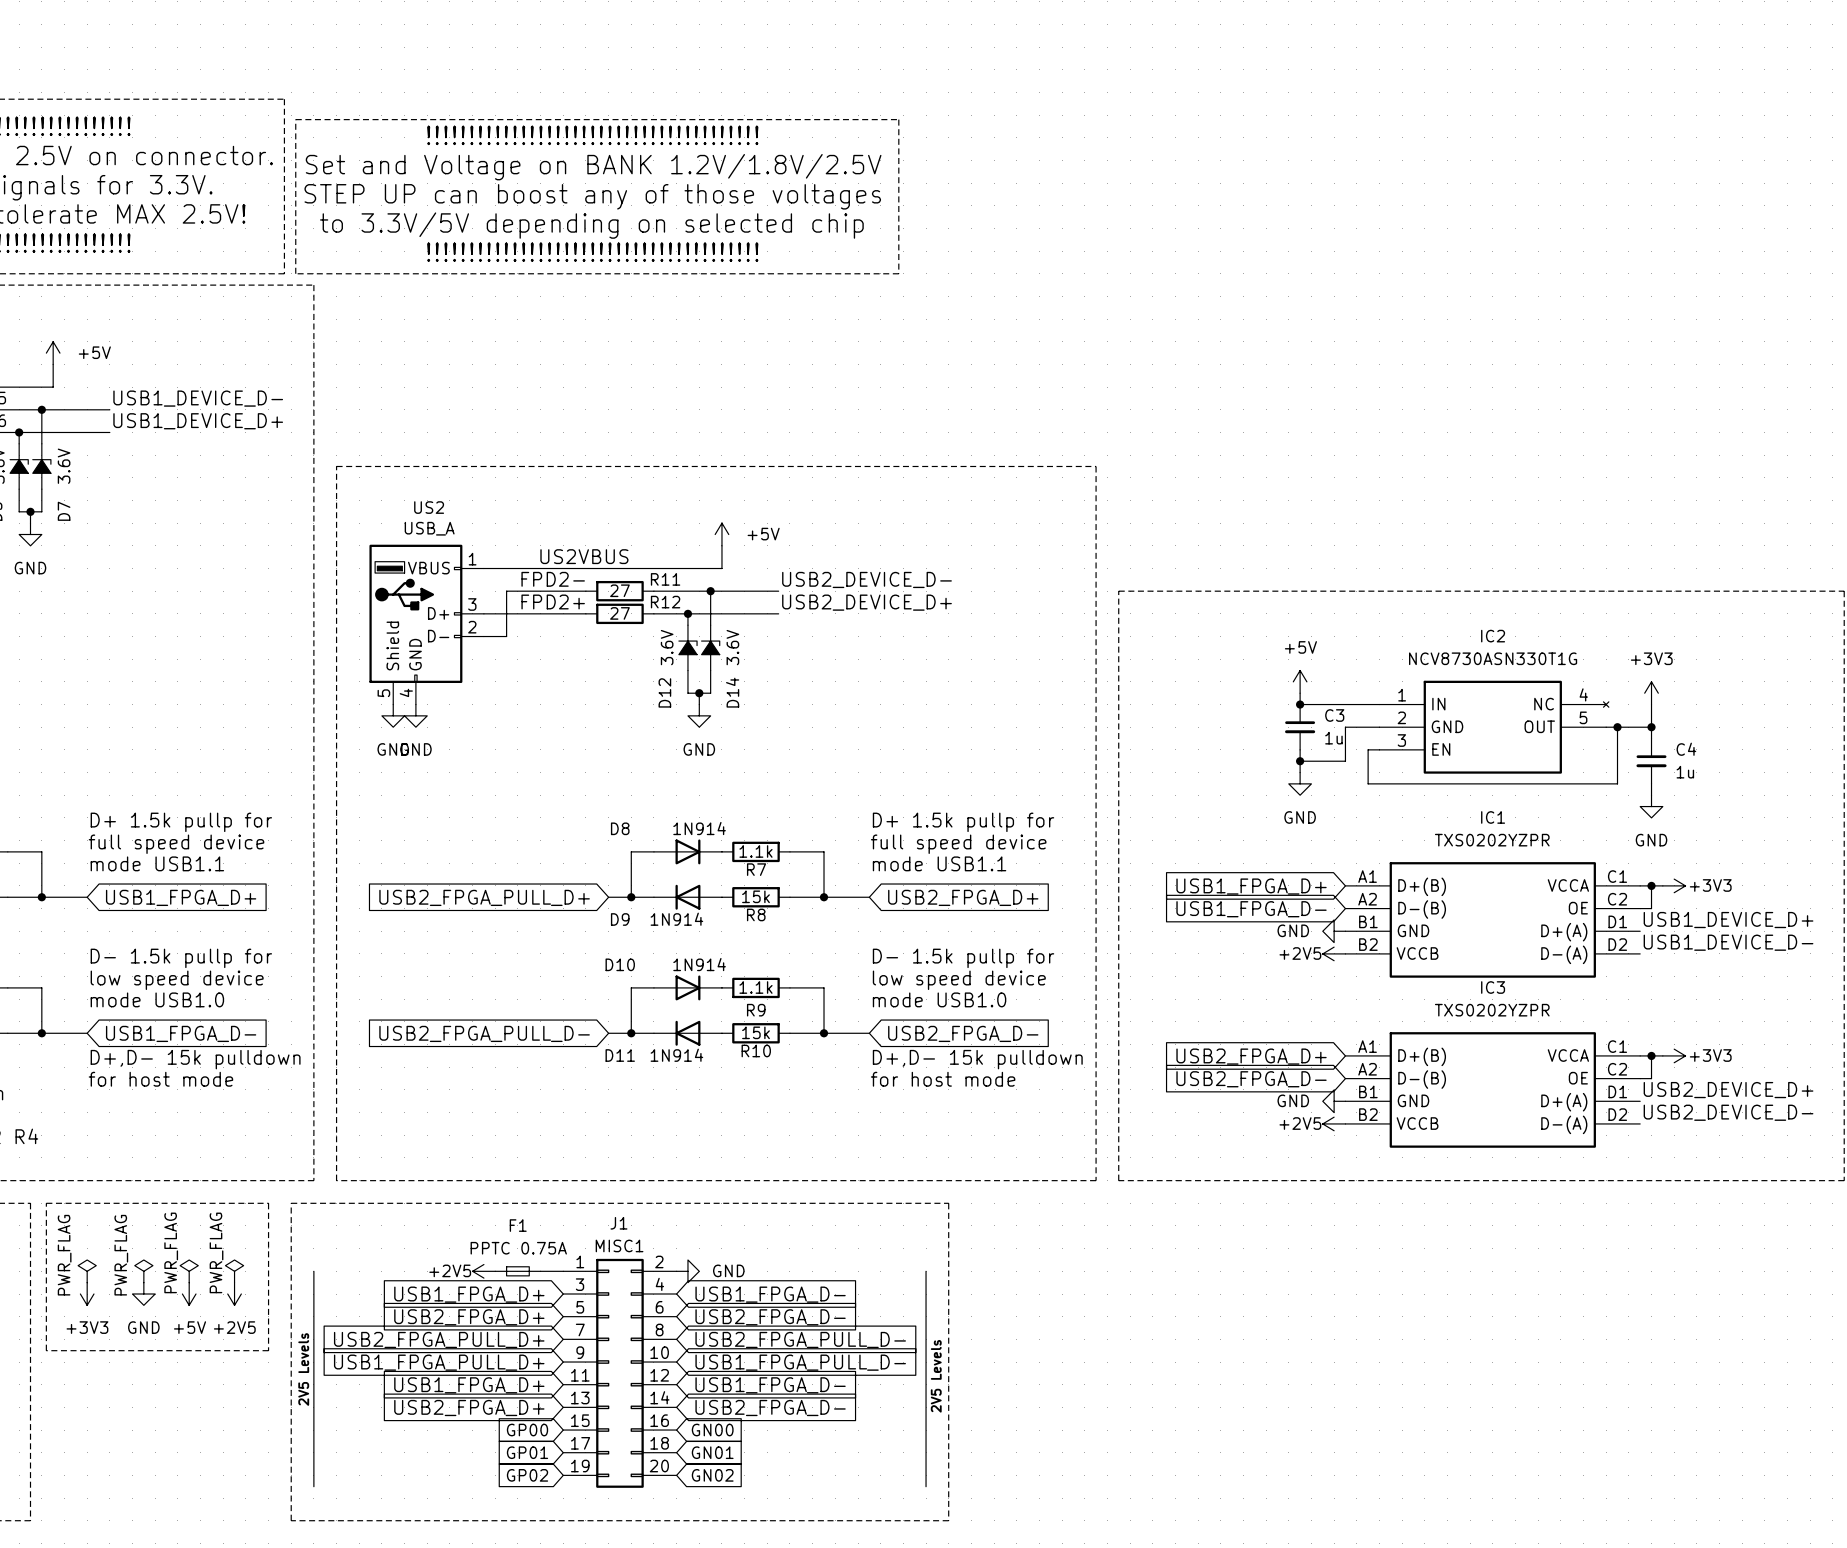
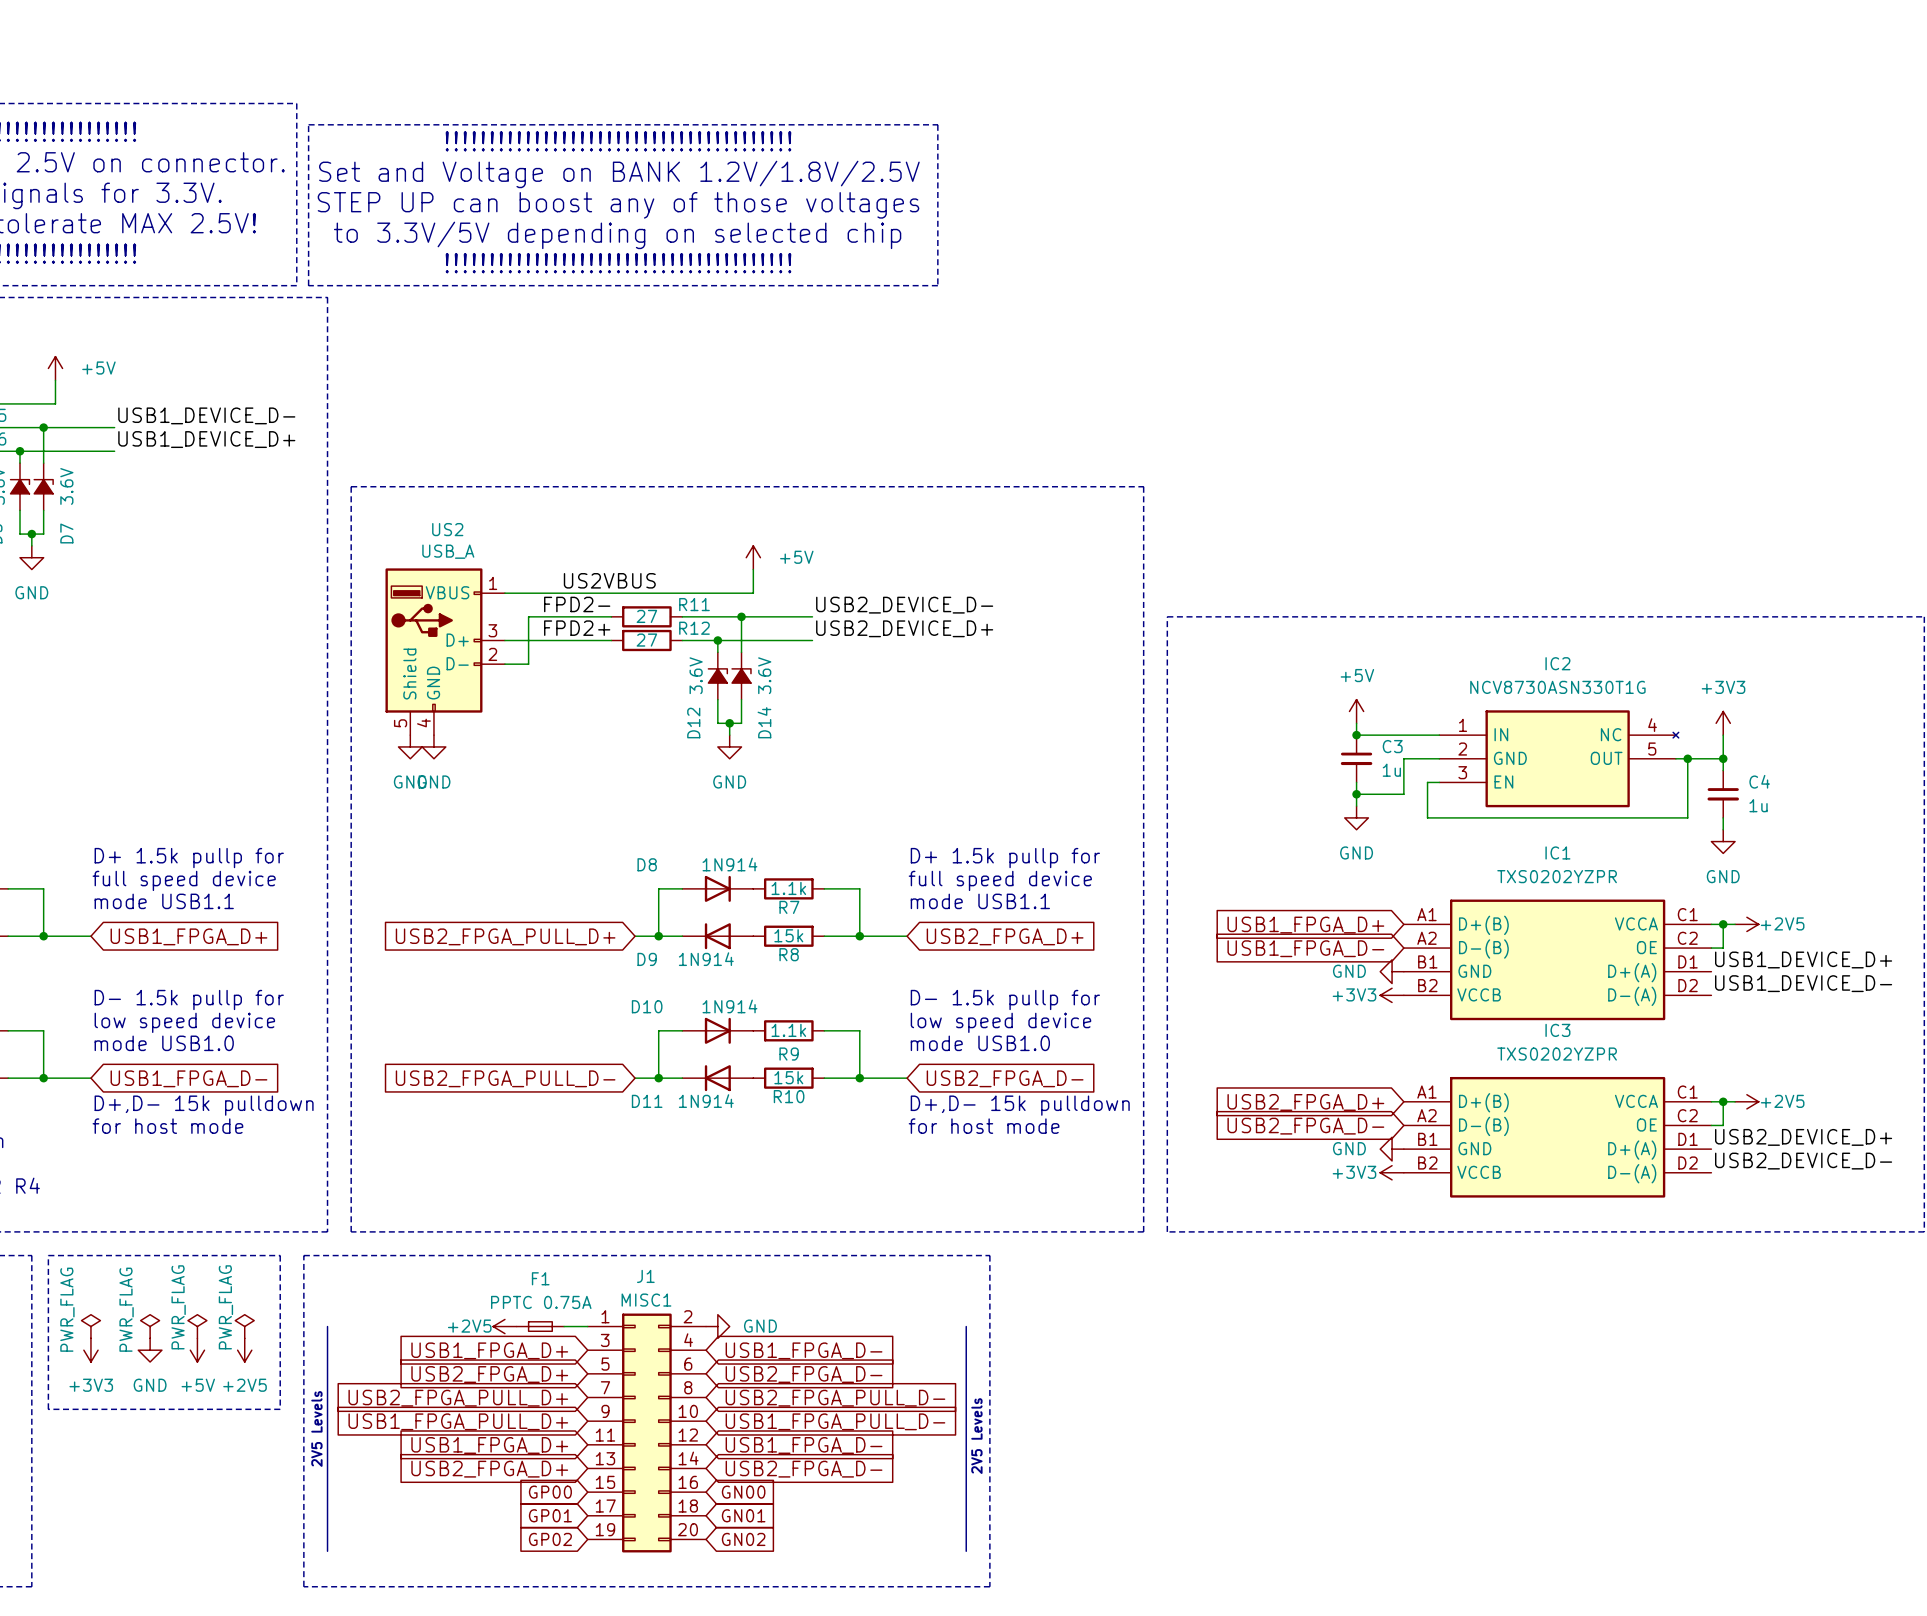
power symbol: +3V3 (1674, 885) -> +2V5 (1746, 924)
power symbol: +2V5 (1334, 953) -> +3V3 (1392, 995)
power symbol: +3V3 (1674, 1055) -> +2V5 (1746, 1101)
power symbol: +2V5 (1334, 1123) -> +3V3 (1392, 1172)

